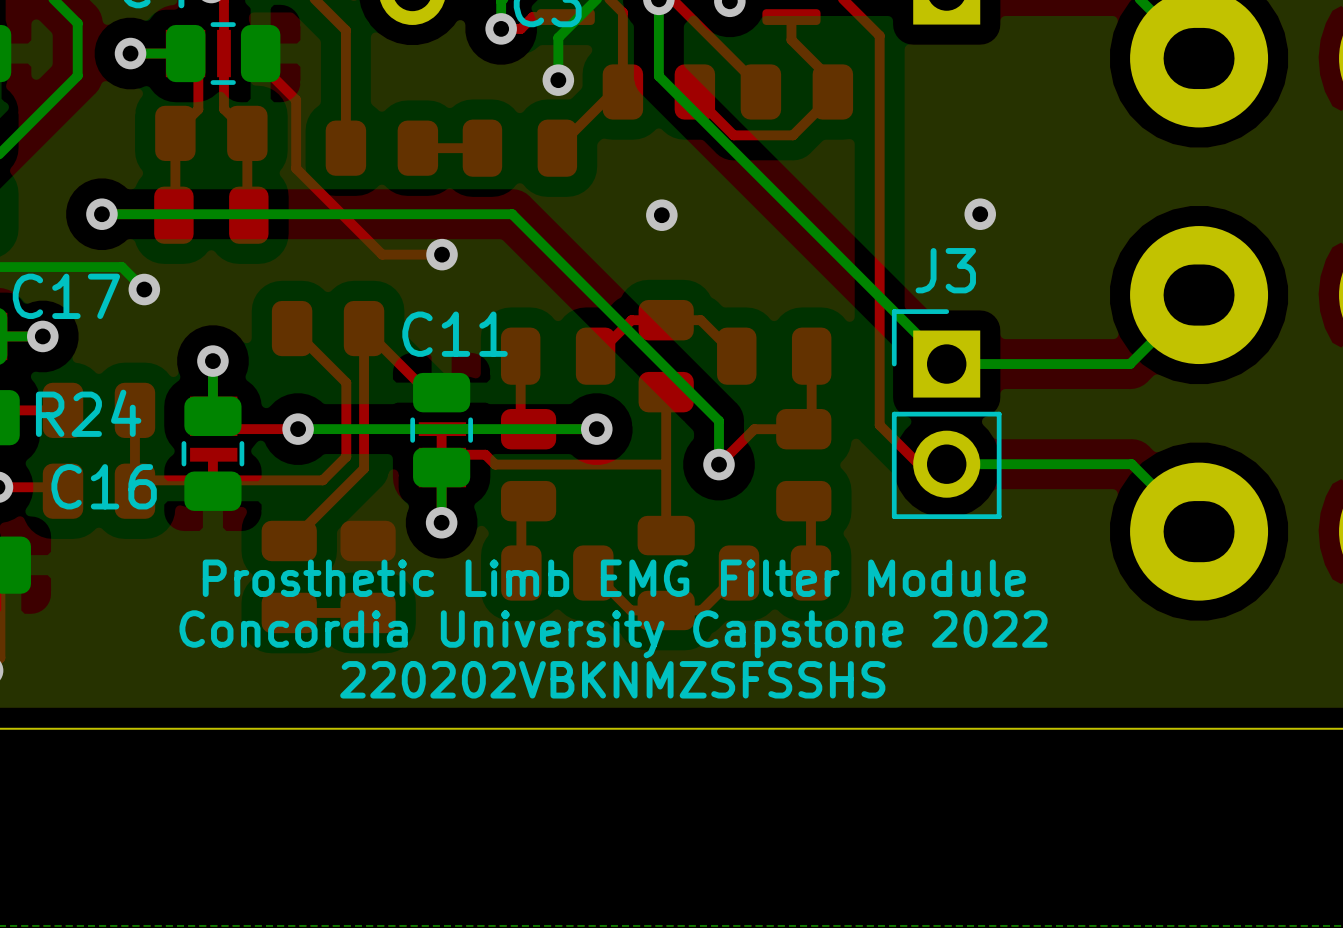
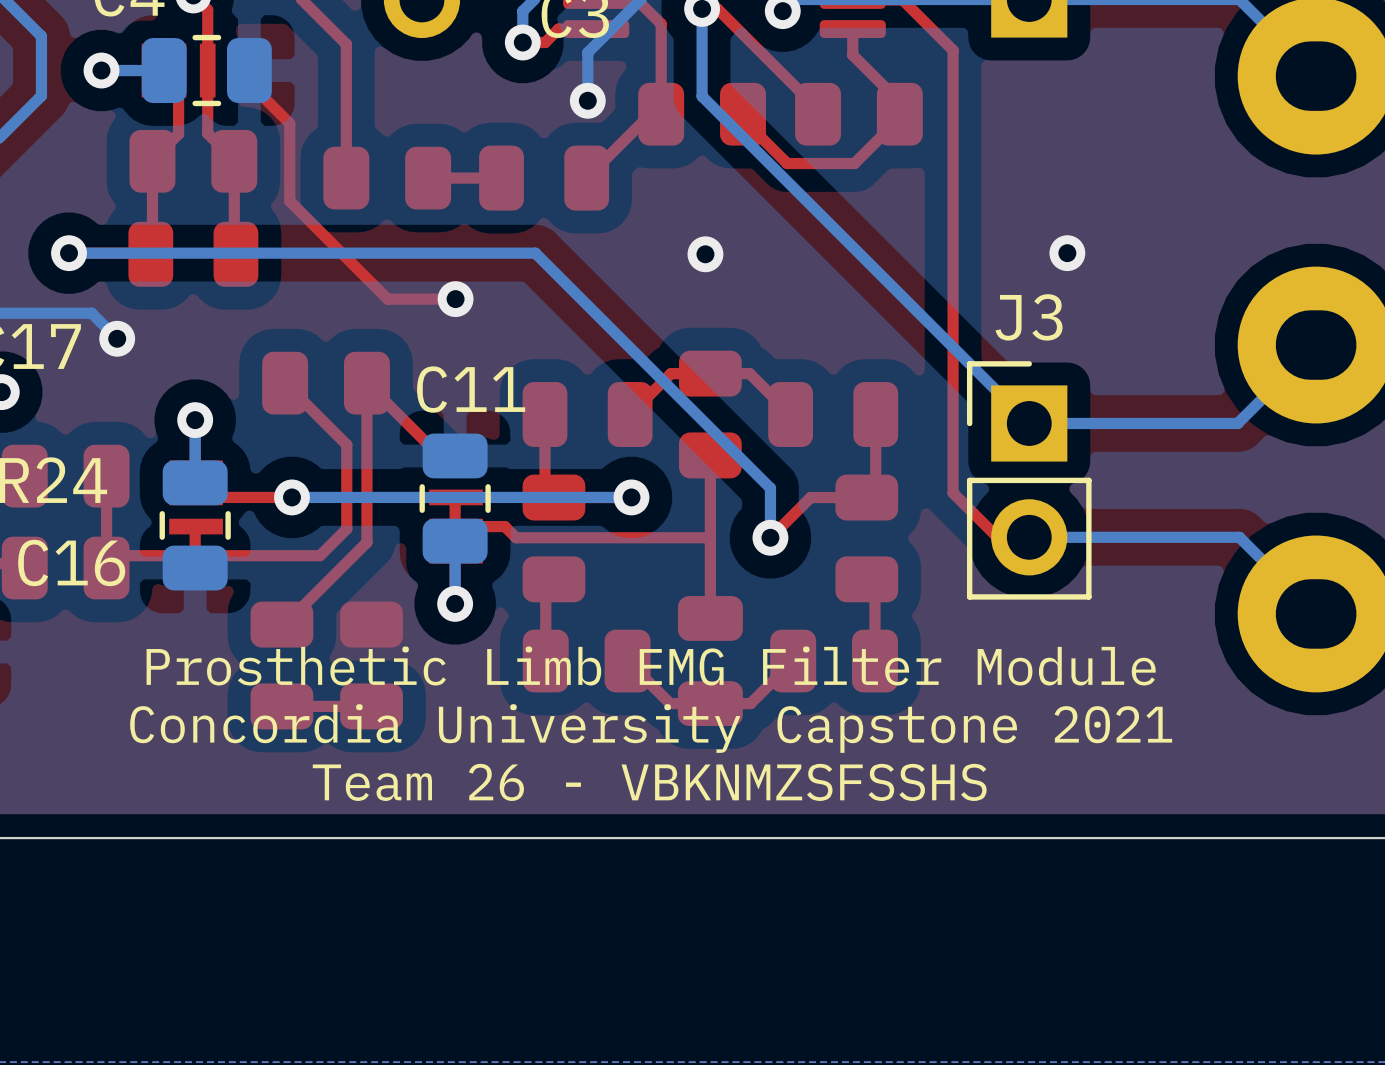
text: Concordia University Capstone 2022 (613, 634) -> Concordia University Capstone 2021 (651, 728)
text: 220202VBKNMZSFSSHS (612, 679) -> Team 26 - VBKNMZSFSSHS (649, 782)

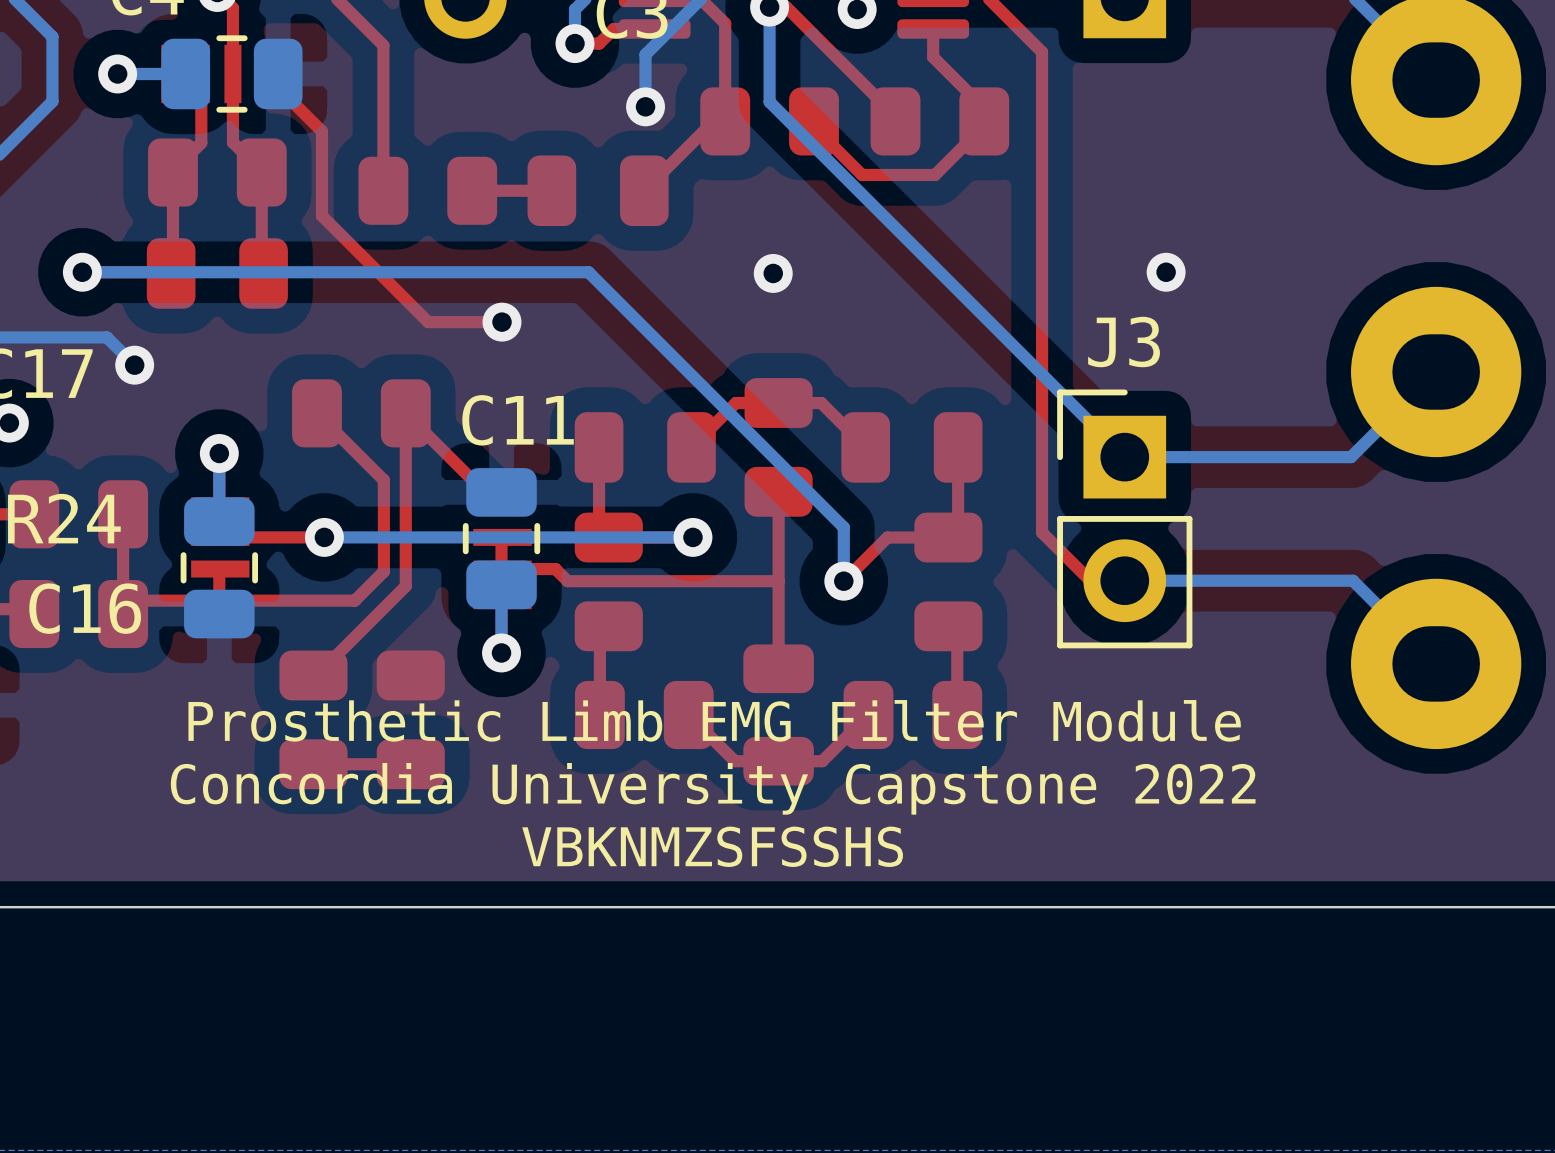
text: Concordia University Capstone 2021 (651, 728) -> Concordia University Capstone 2022 (713, 788)
text: Team 26 - VBKNMZSFSSHS (649, 782) -> VBKNMZSFSSHS (712, 846)

